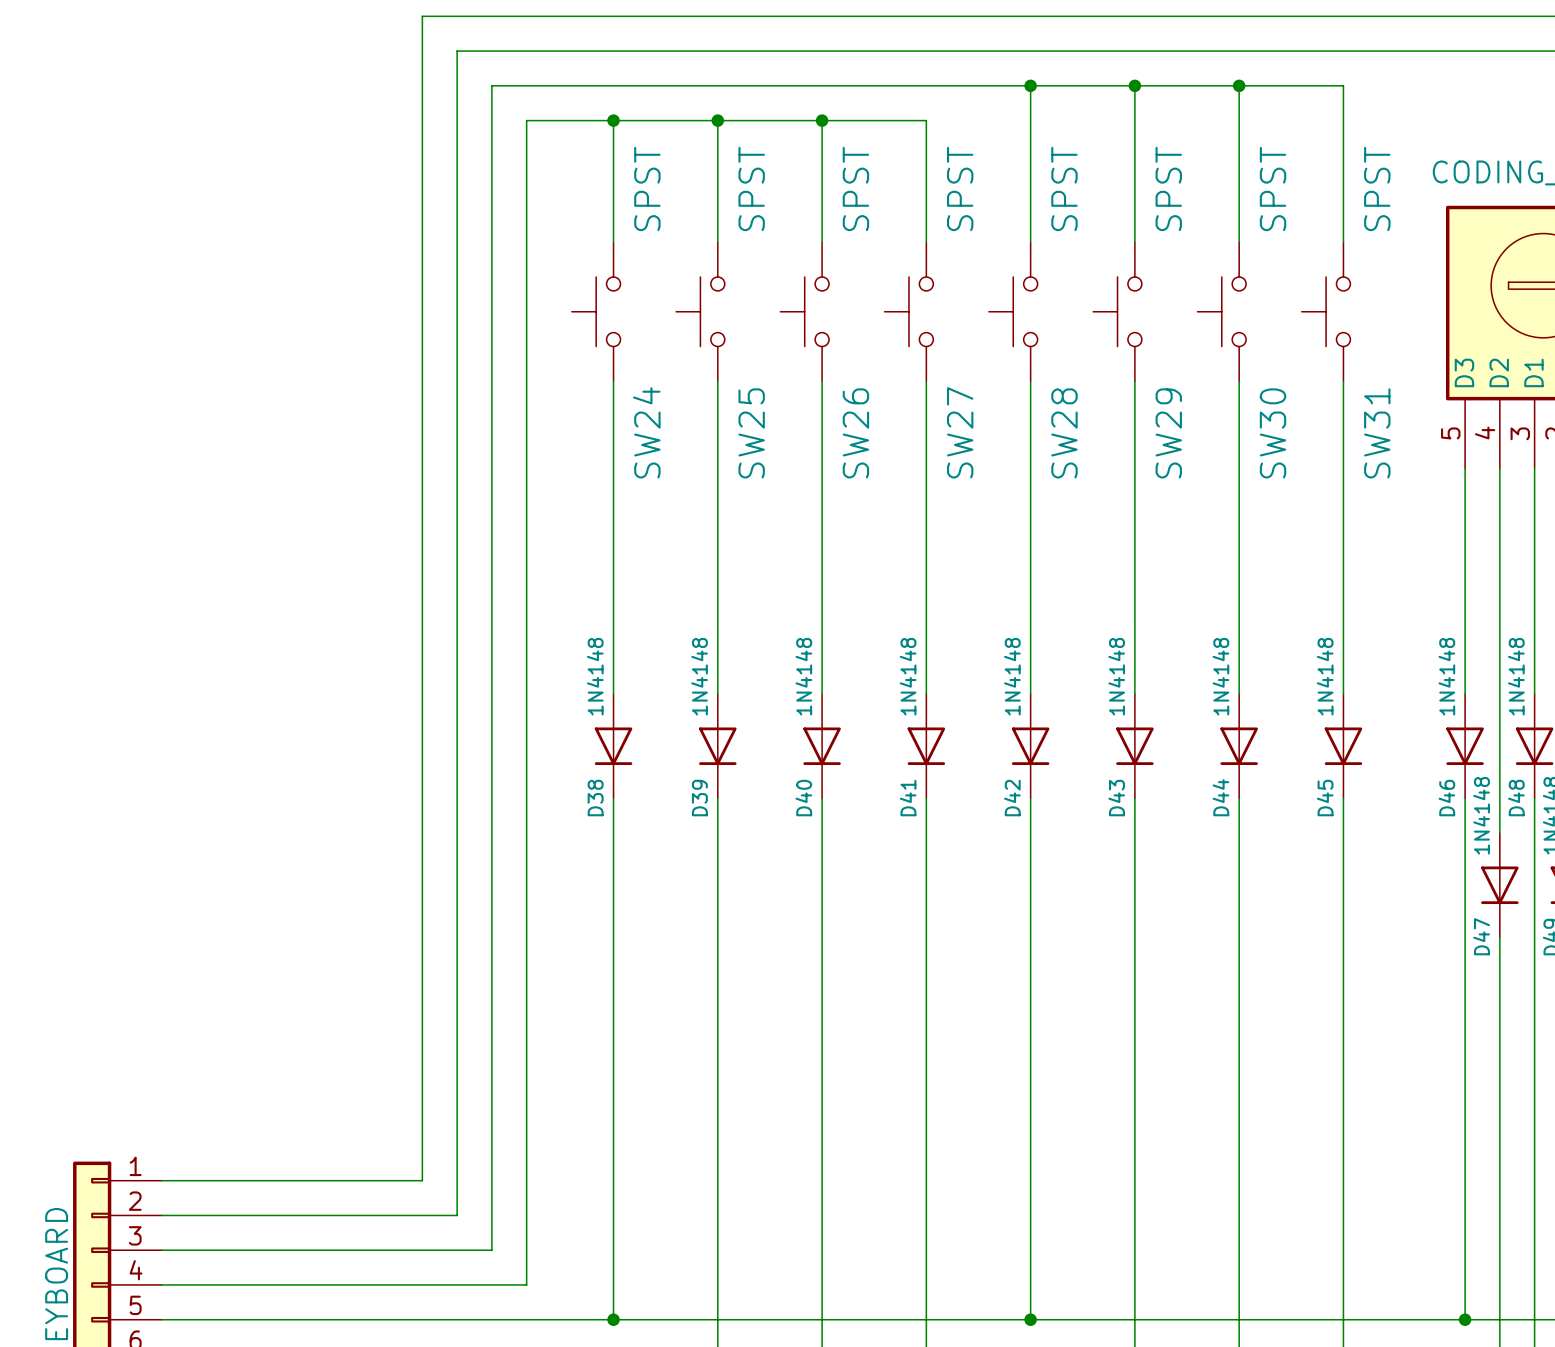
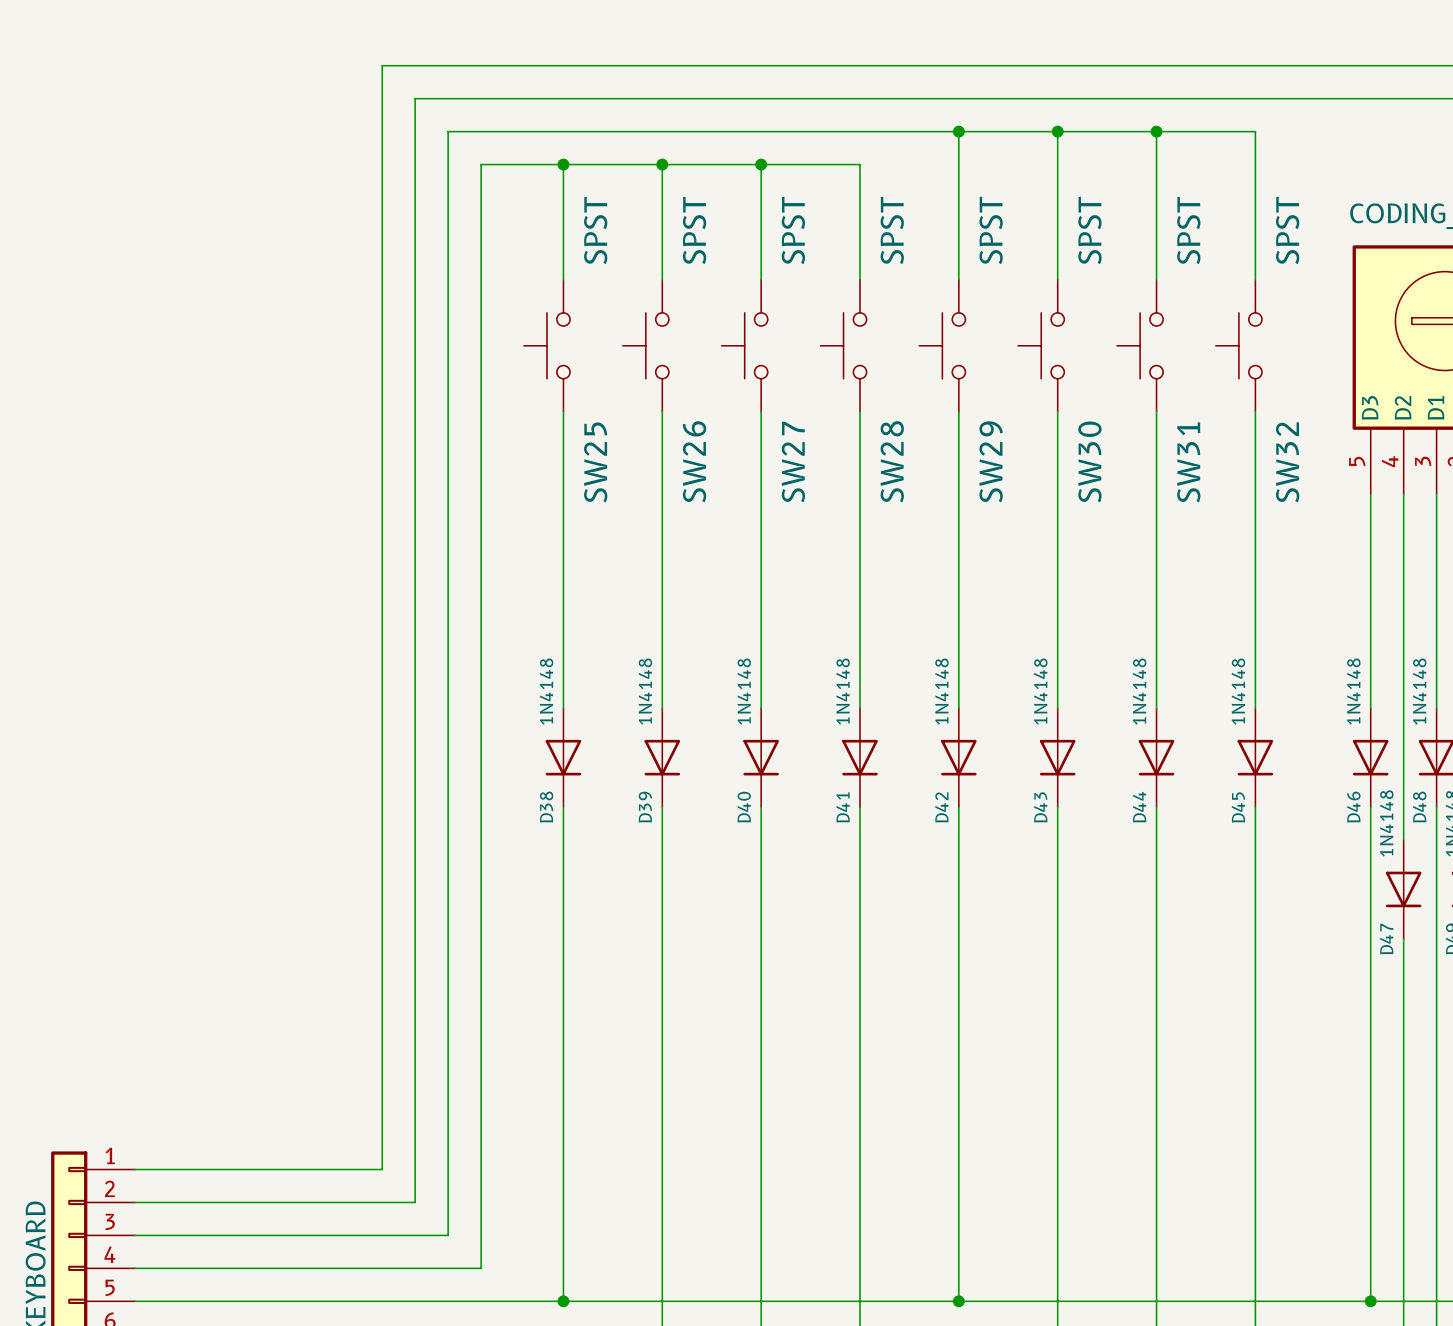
SW24 name: SW24 (646, 432) -> SW25 (595, 462)
SW27 name: SW27 (960, 432) -> SW28 (892, 461)
SW25 name: SW25 (751, 433) -> SW26 (694, 461)
SW26 name: SW26 (855, 433) -> SW27 (793, 462)
SW28 name: SW28 (1064, 433) -> SW29 (991, 461)
SW29 name: SW29 (1168, 433) -> SW30 (1089, 461)
SW30 name: SW30 (1273, 433) -> SW31 (1188, 462)
SW31 name: SW31 (1377, 433) -> SW32 (1287, 462)

